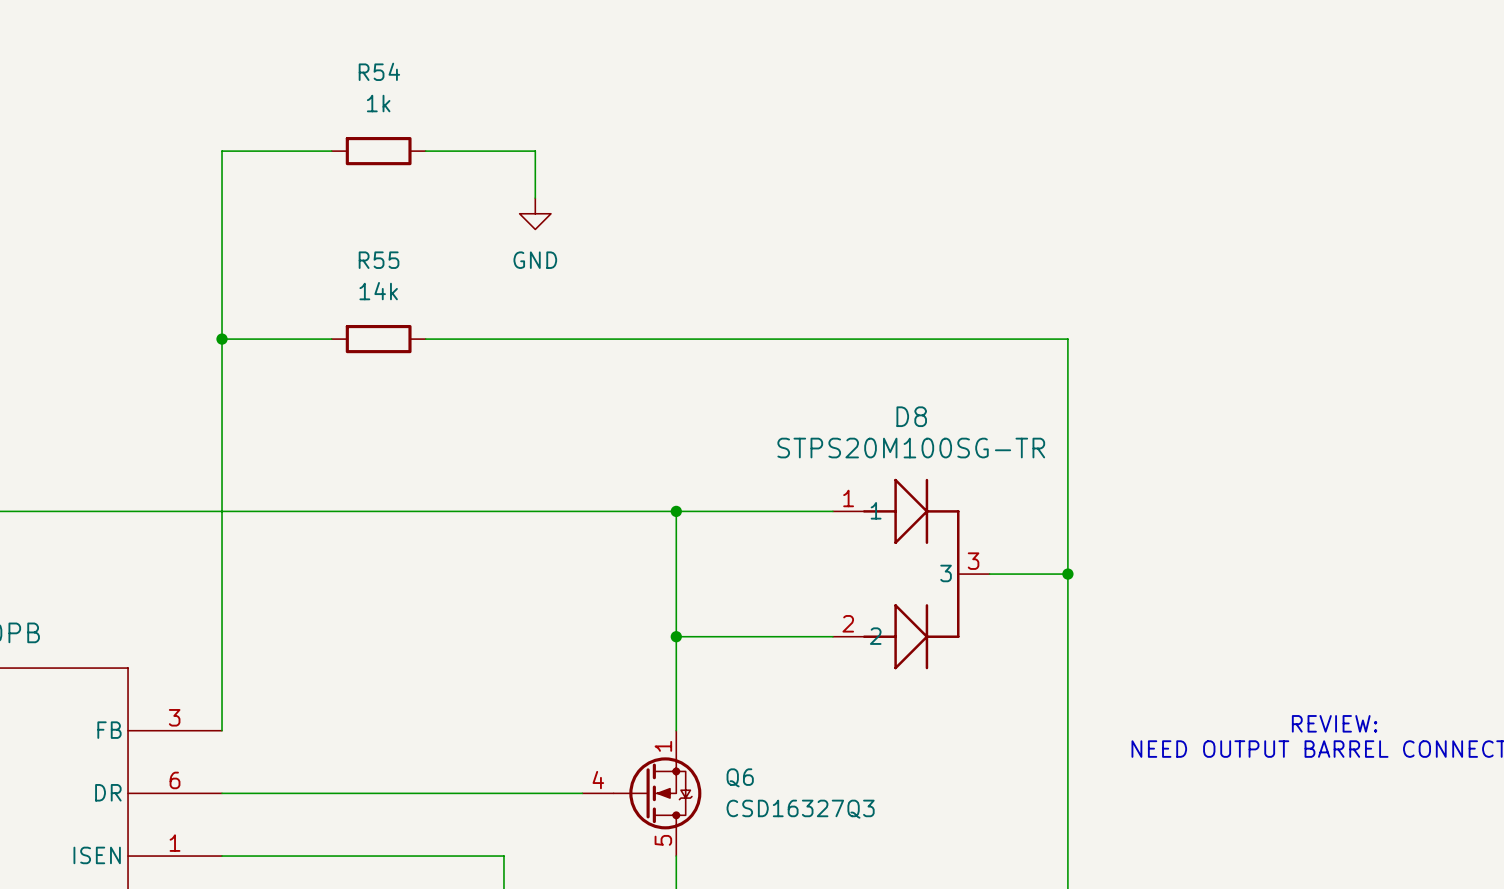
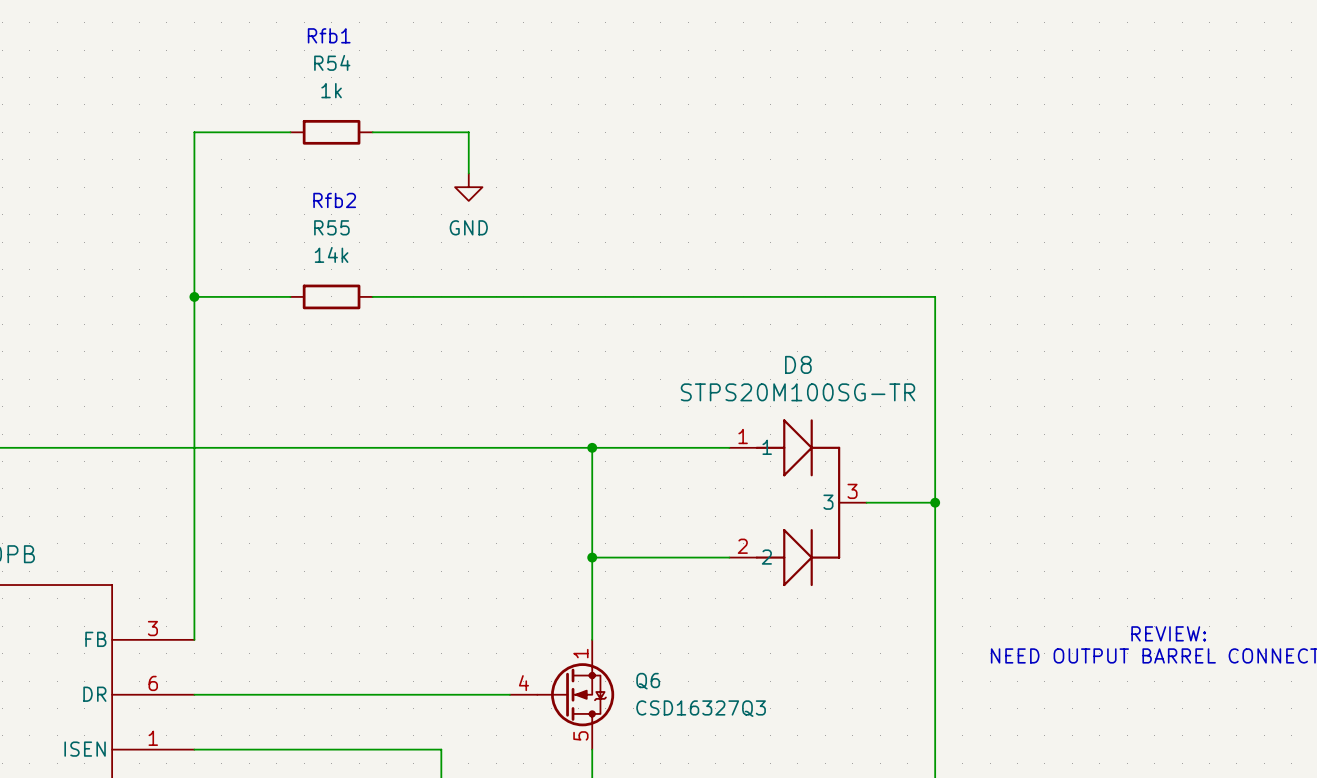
text: none -> Rfb1 (329, 35)
text: none -> Rfb2 (334, 200)

